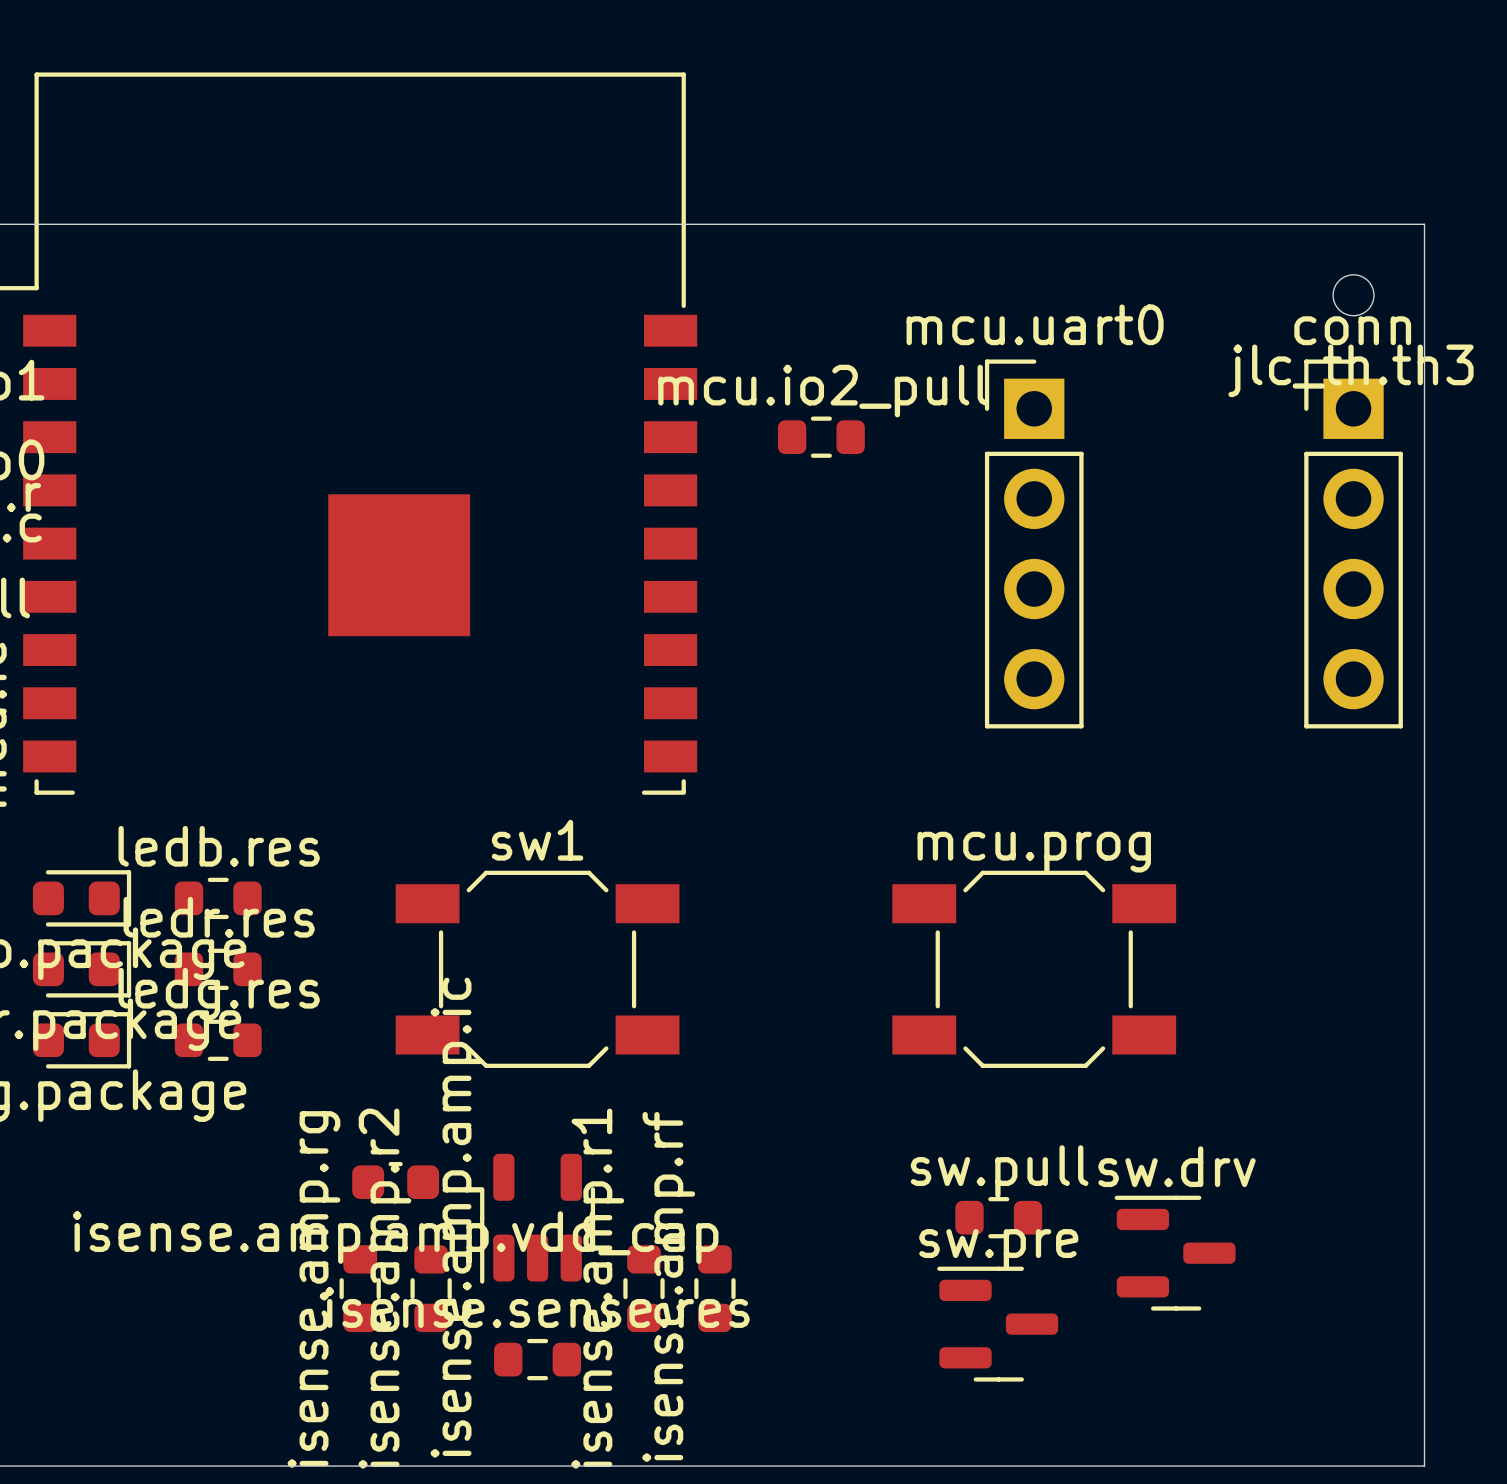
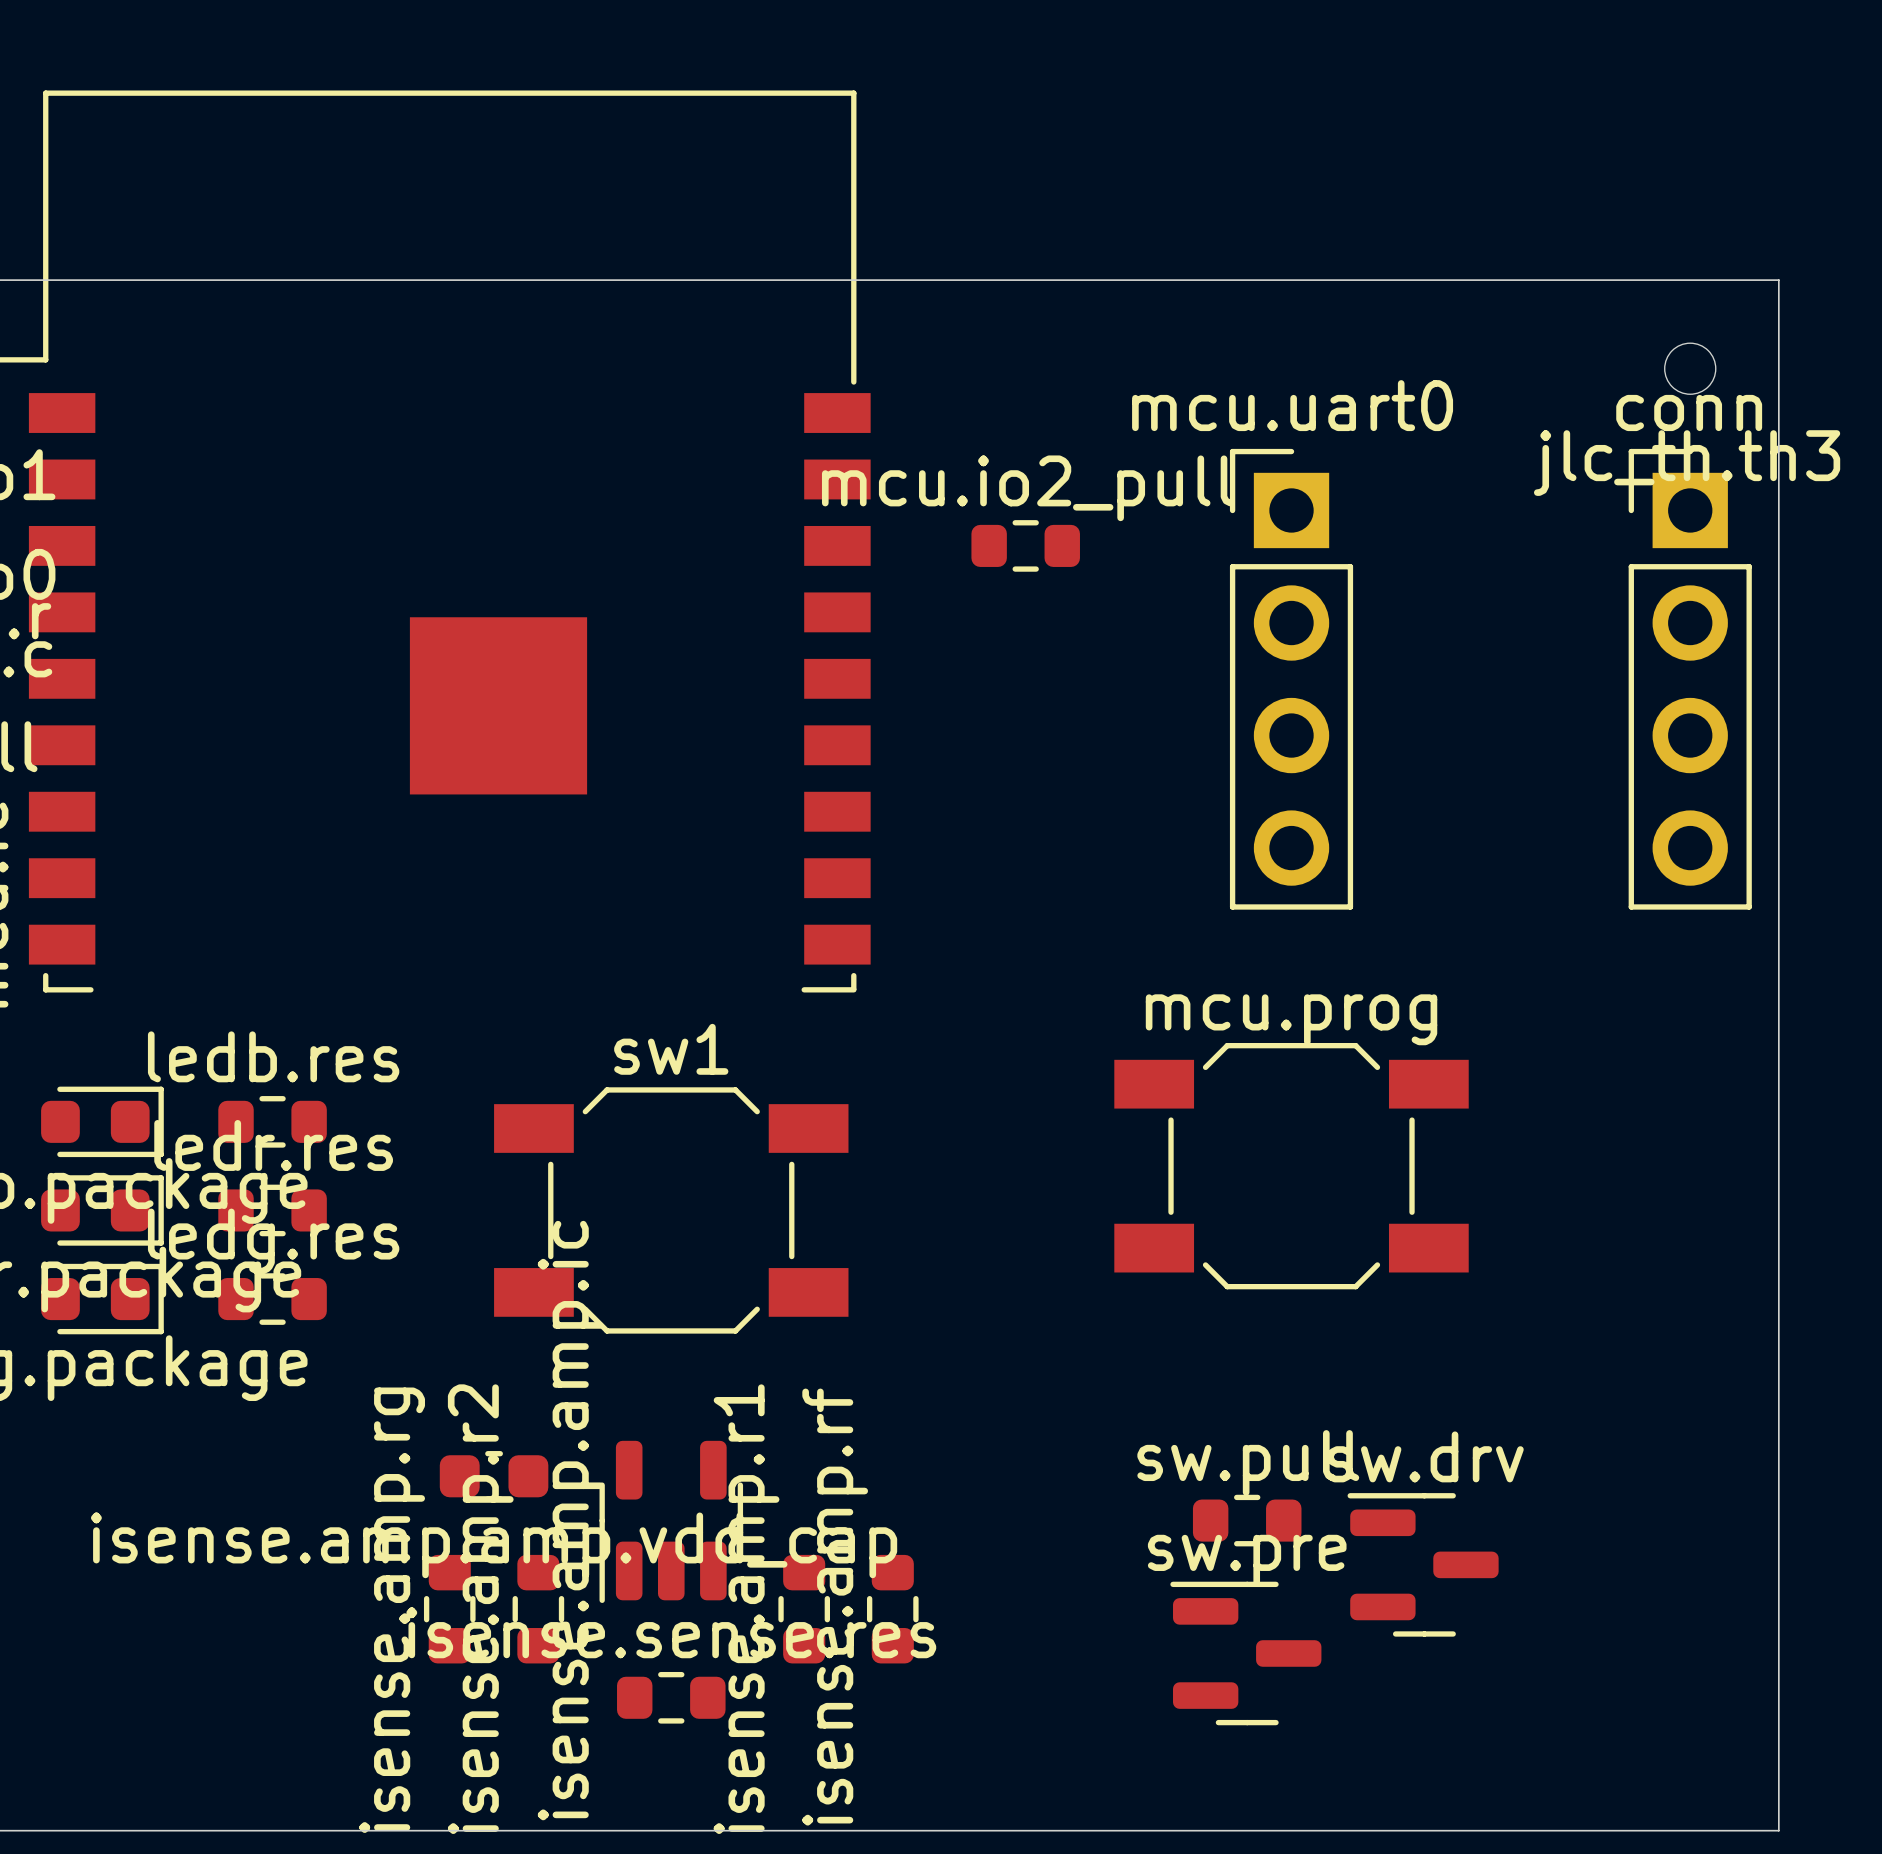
mcu.prog position: (1034, 969) -> (1291, 1166)
sw.drv position: (1175, 1253) -> (1423, 1564)

